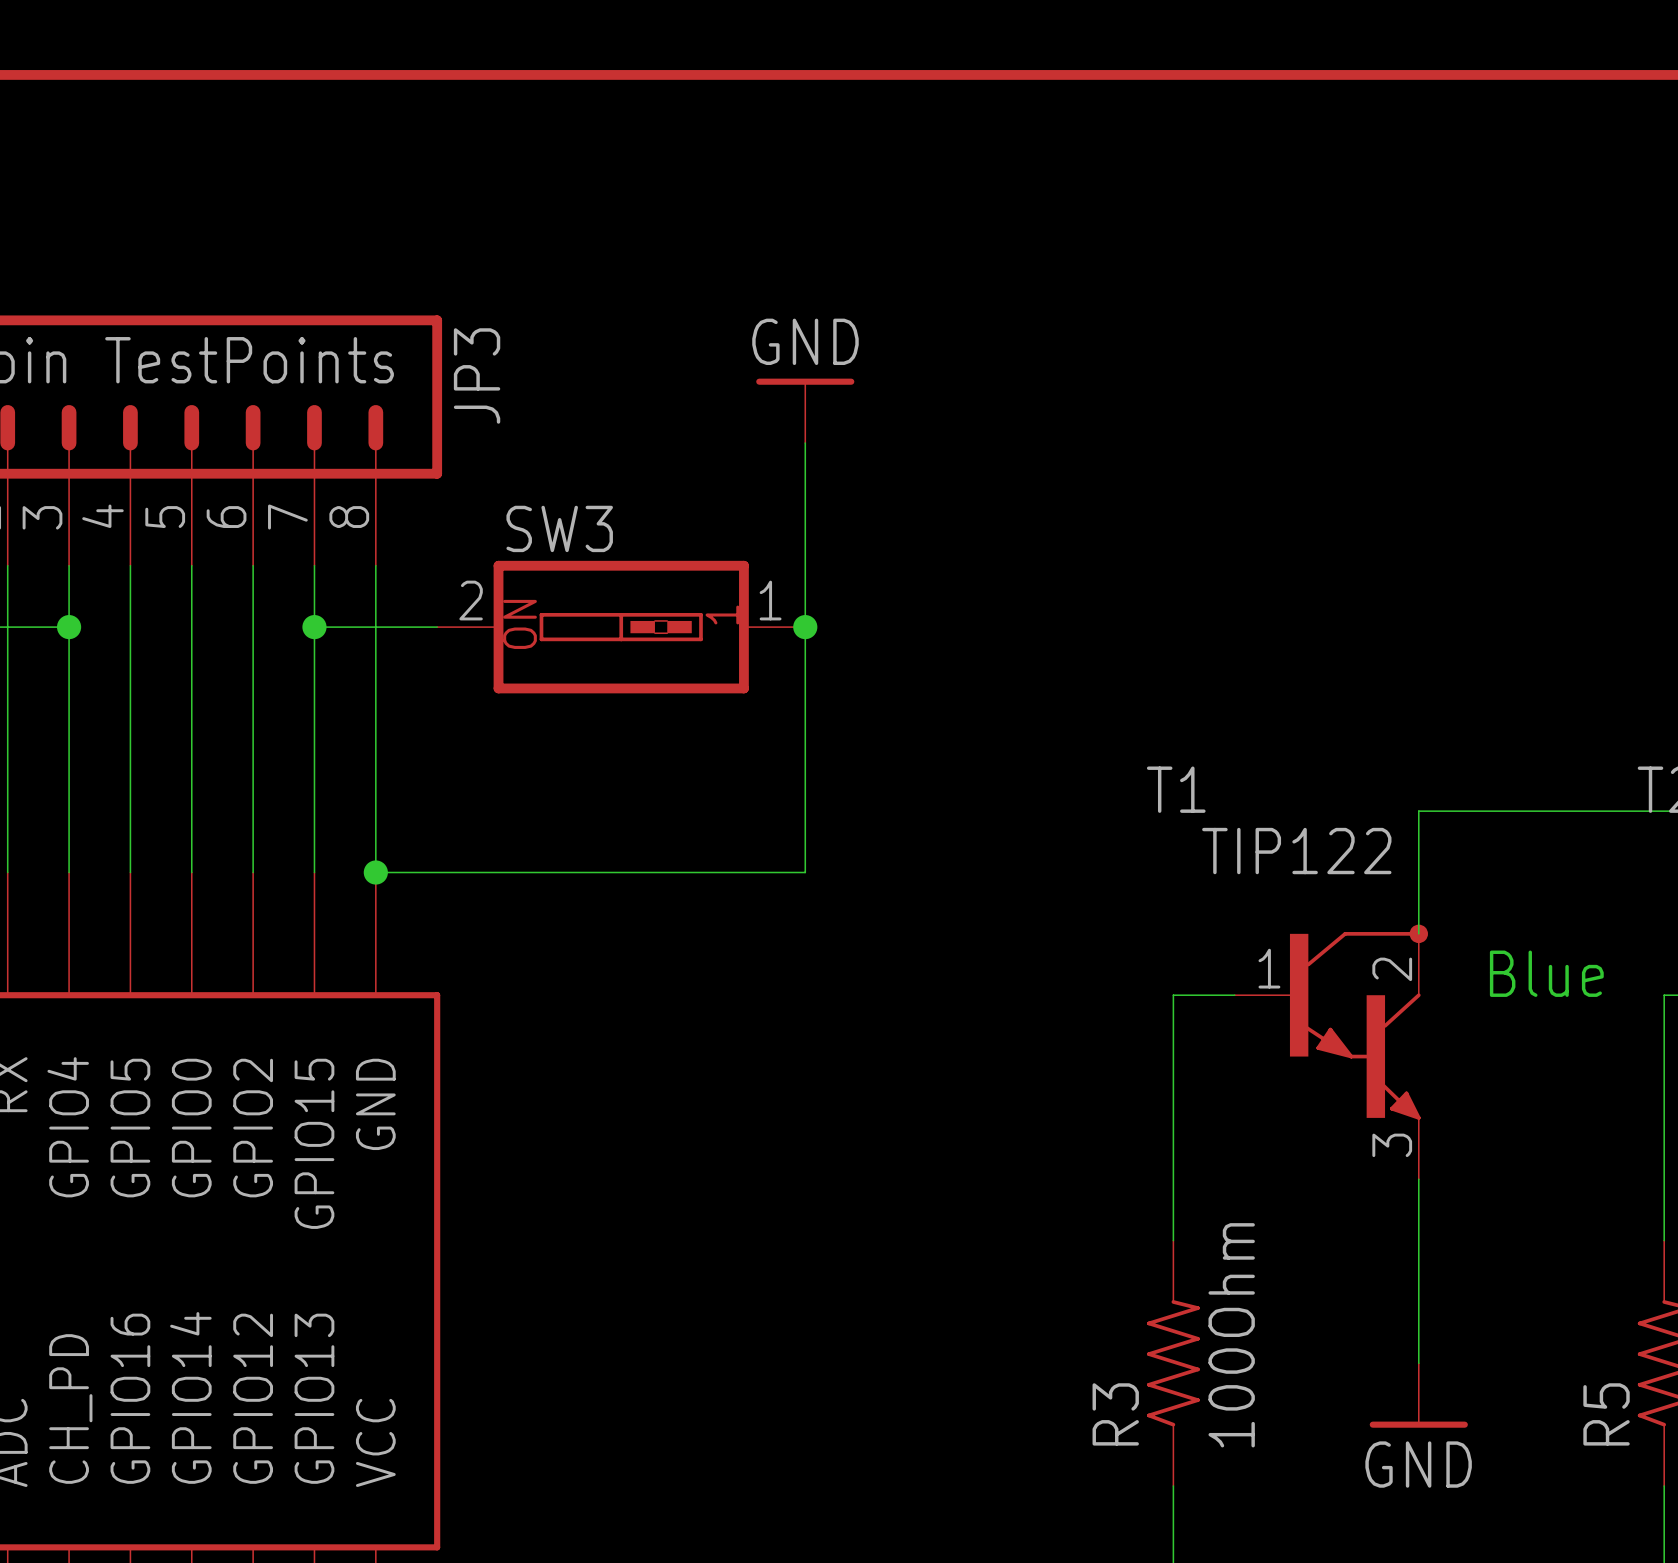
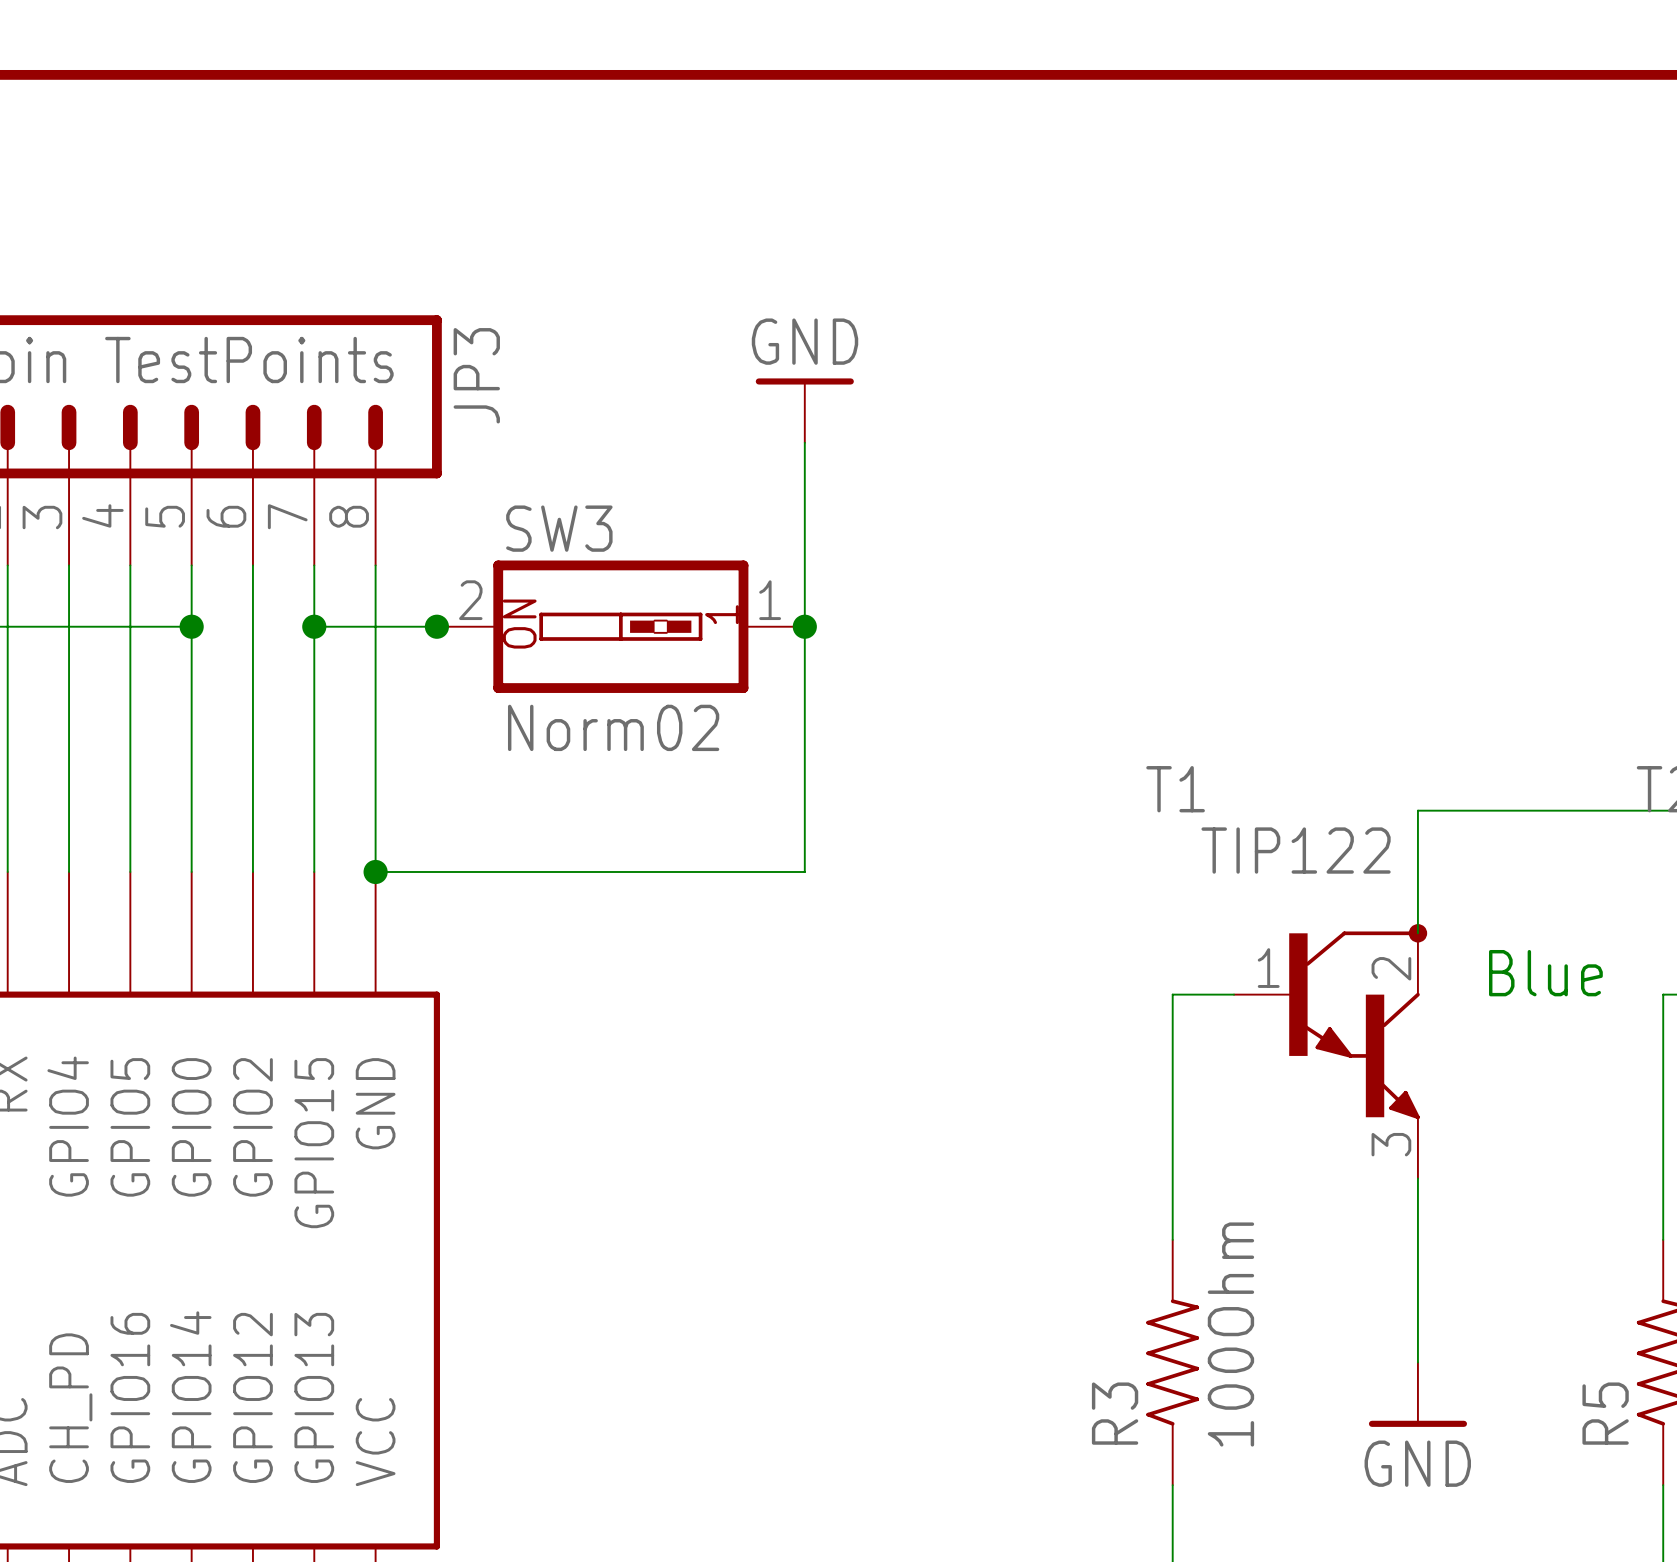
wire: none -> (69, 626) (191, 626)
junction position: (69, 627) -> (191, 626)
junction: none -> (436, 626)
SW3 value: none -> Norm02 (613, 727)

